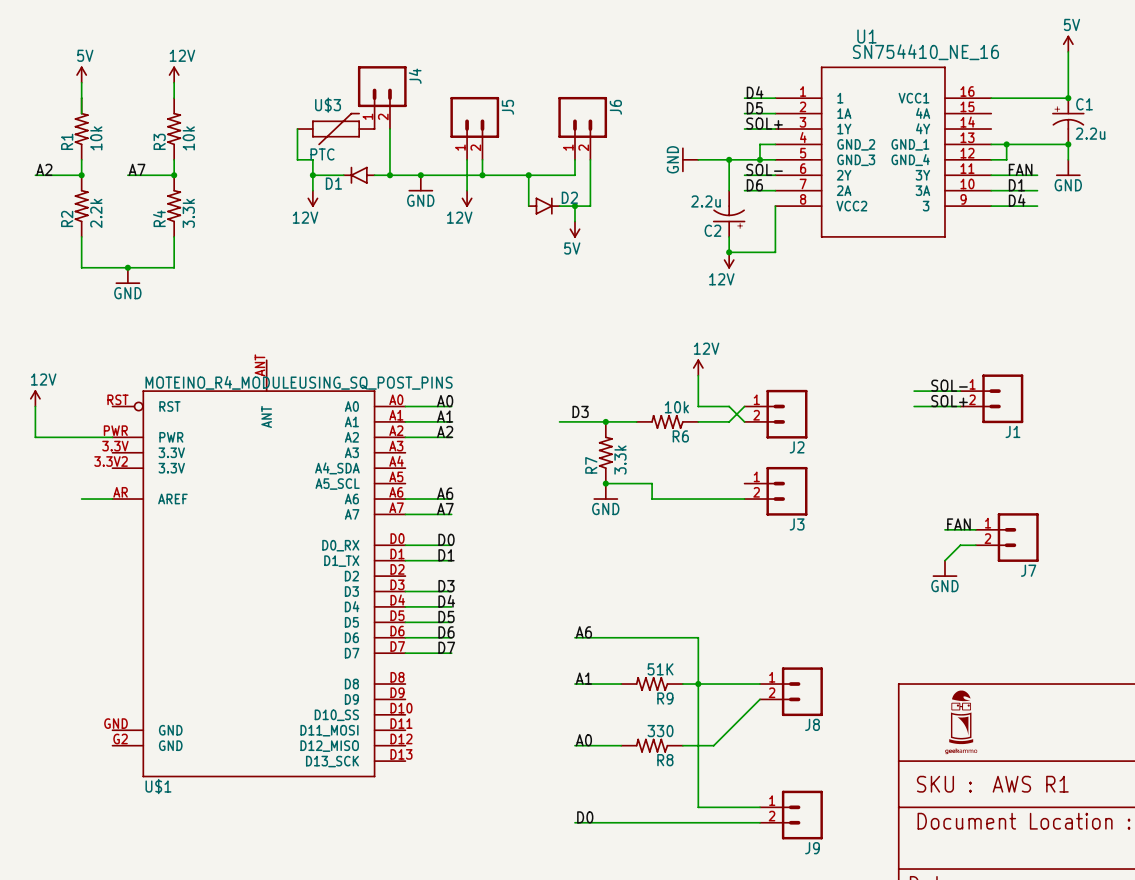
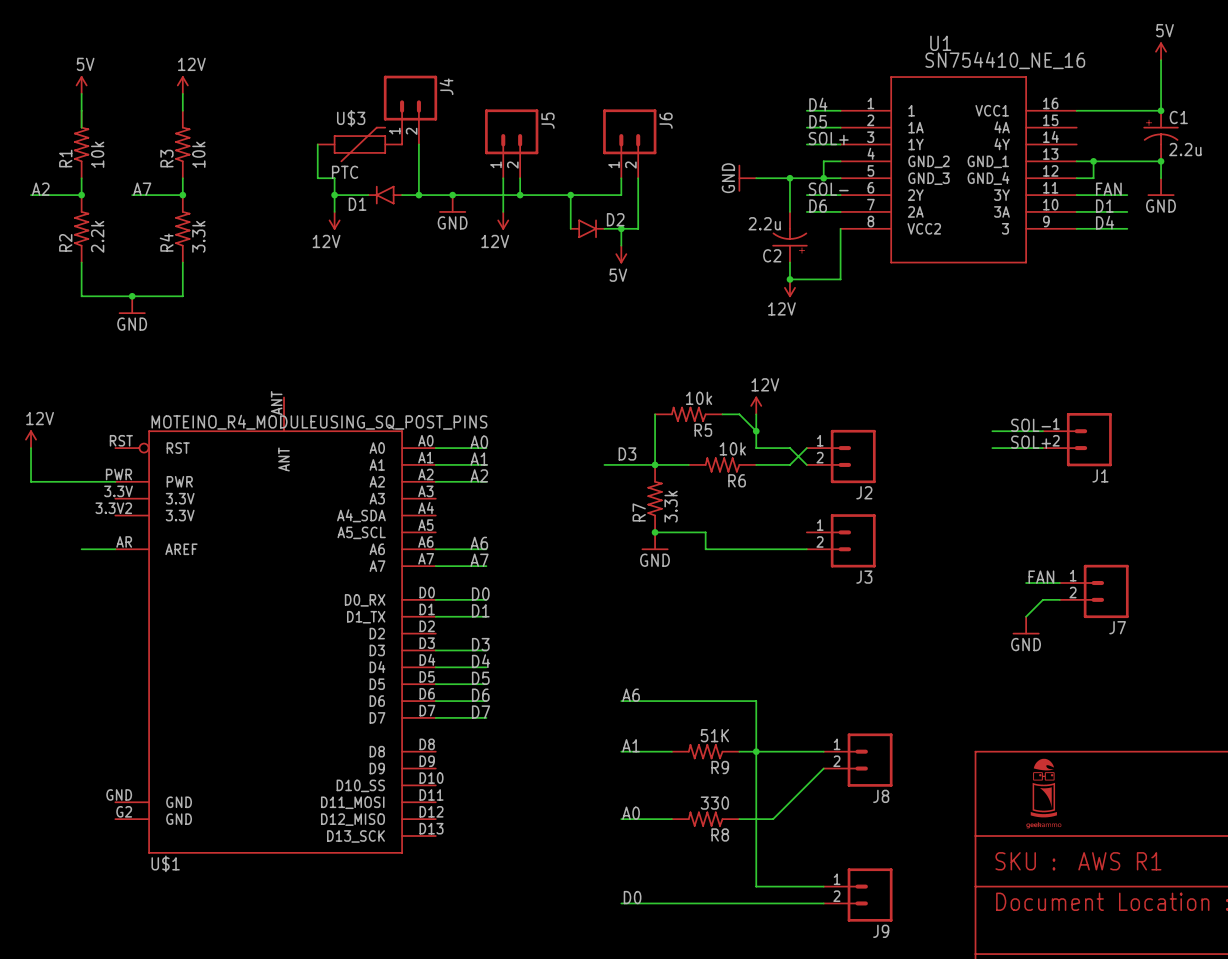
wire: none -> (655, 414) (655, 464)
R5: none -> 10k (688, 414)
wire: none -> (722, 414) (739, 414) (756, 431)
junction: none -> (756, 431)

